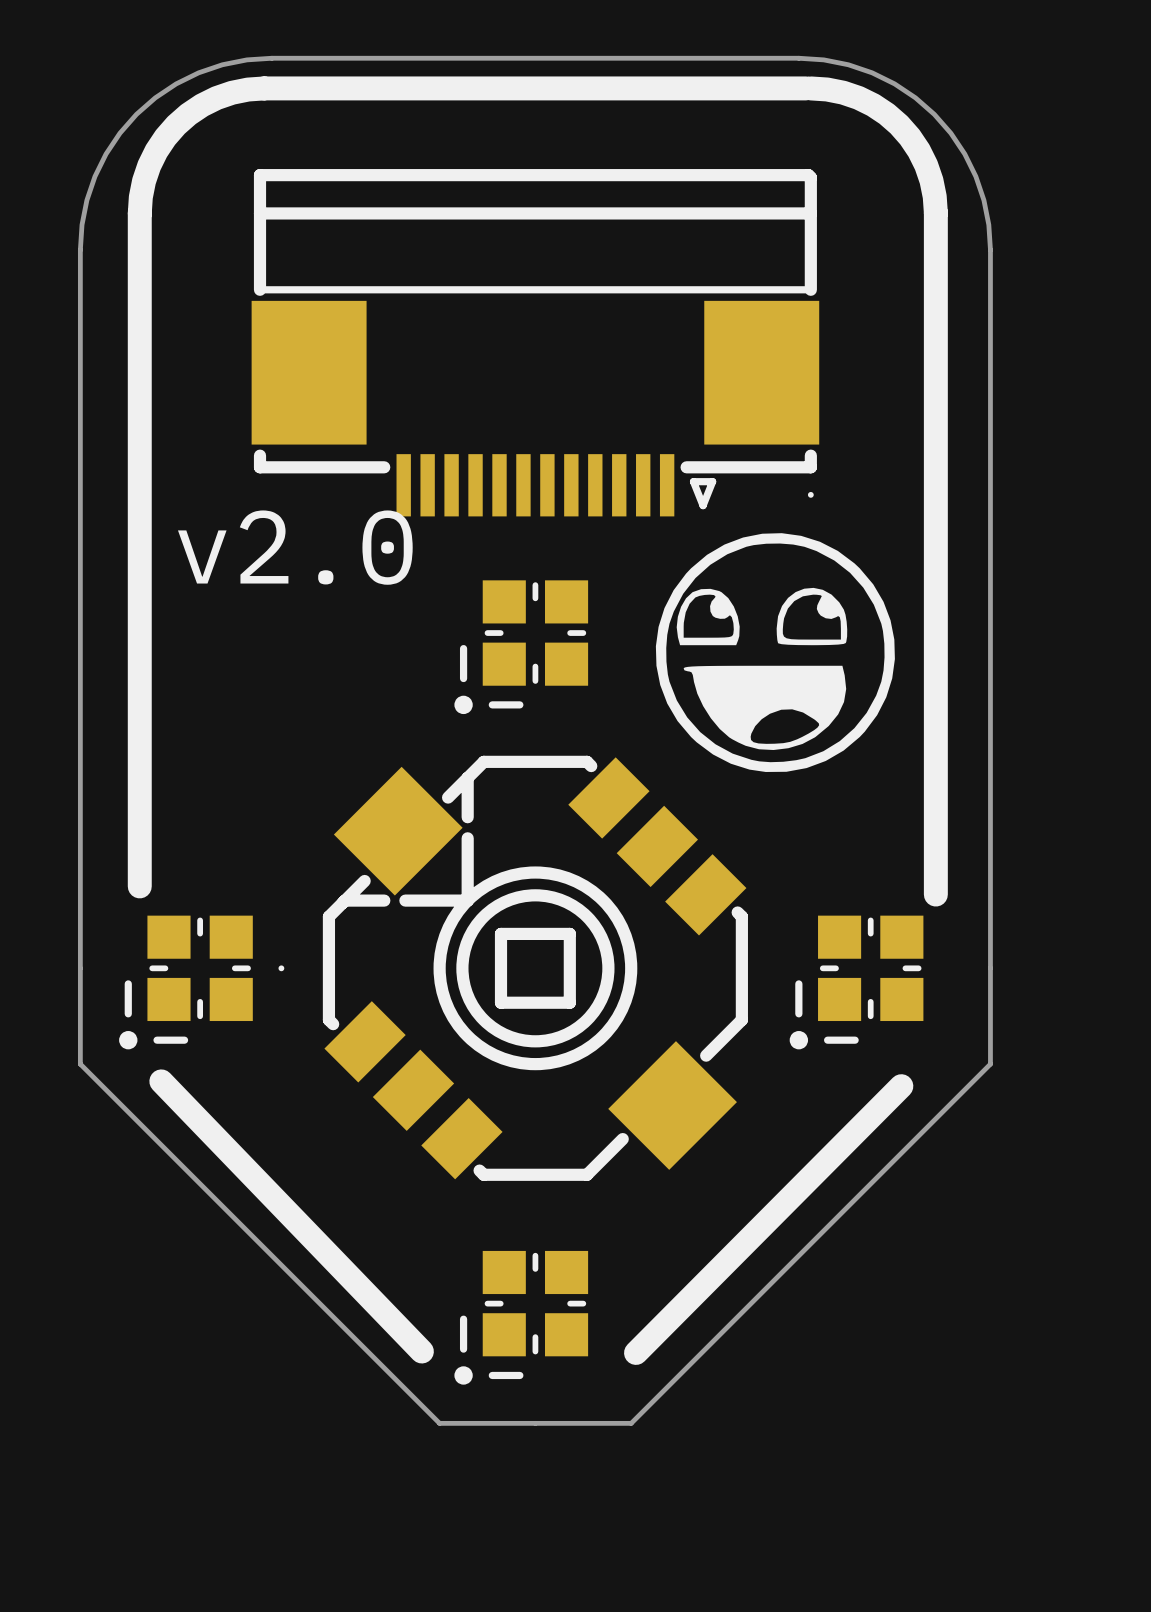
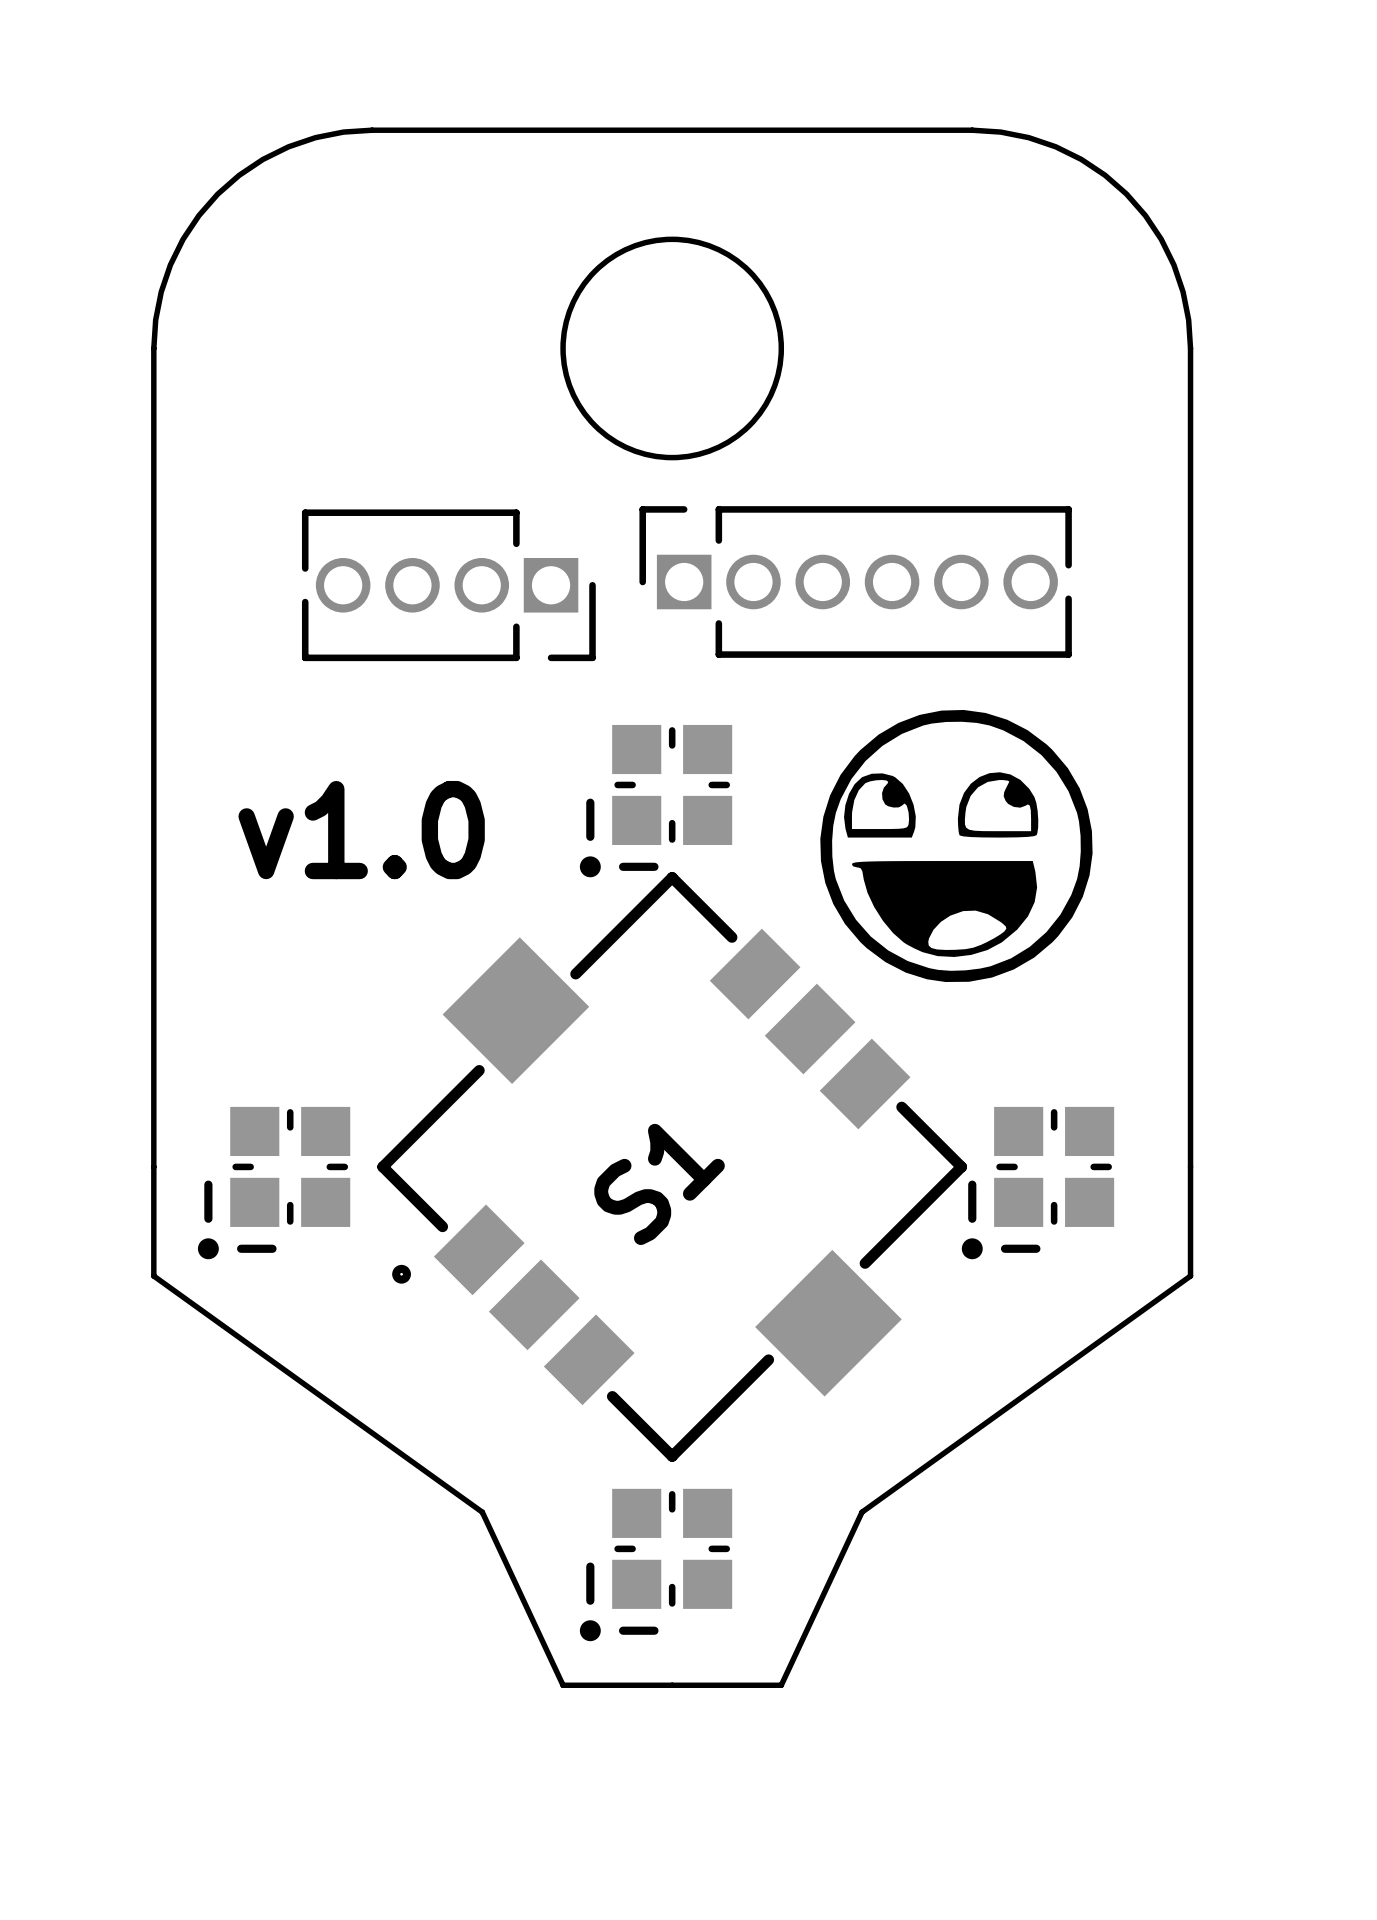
line: (806, 88) (248, 89) (232, 92) (202, 105) (188, 114) (165, 137) (156, 151) (144, 181) (139, 213) (139, 886) -> none
line: (810, 88) (843, 92) (858, 97) (886, 114) (909, 137) (918, 150) (931, 180) (934, 196) (935, 894) -> none
round board edge: none -> [560, 236, 785, 461]
part: (535, 342) -> none
part: none -> (855, 582)
part: none -> (448, 585)
text: v2.0 (295, 547) -> v1.0 (361, 830)
drawing position: (775, 652) -> (956, 845)
part: (513, 968) -> none
S1: none -> (672, 1166)
board edge: (80, 1064) (439, 1423) -> (153, 1276) (482, 1512) (563, 1685)
board edge: (990, 1064) (631, 1423) -> (1190, 1276) (862, 1512) (781, 1685)
line: (161, 1081) (421, 1351) -> none
line: (901, 1086) (636, 1352) -> none

